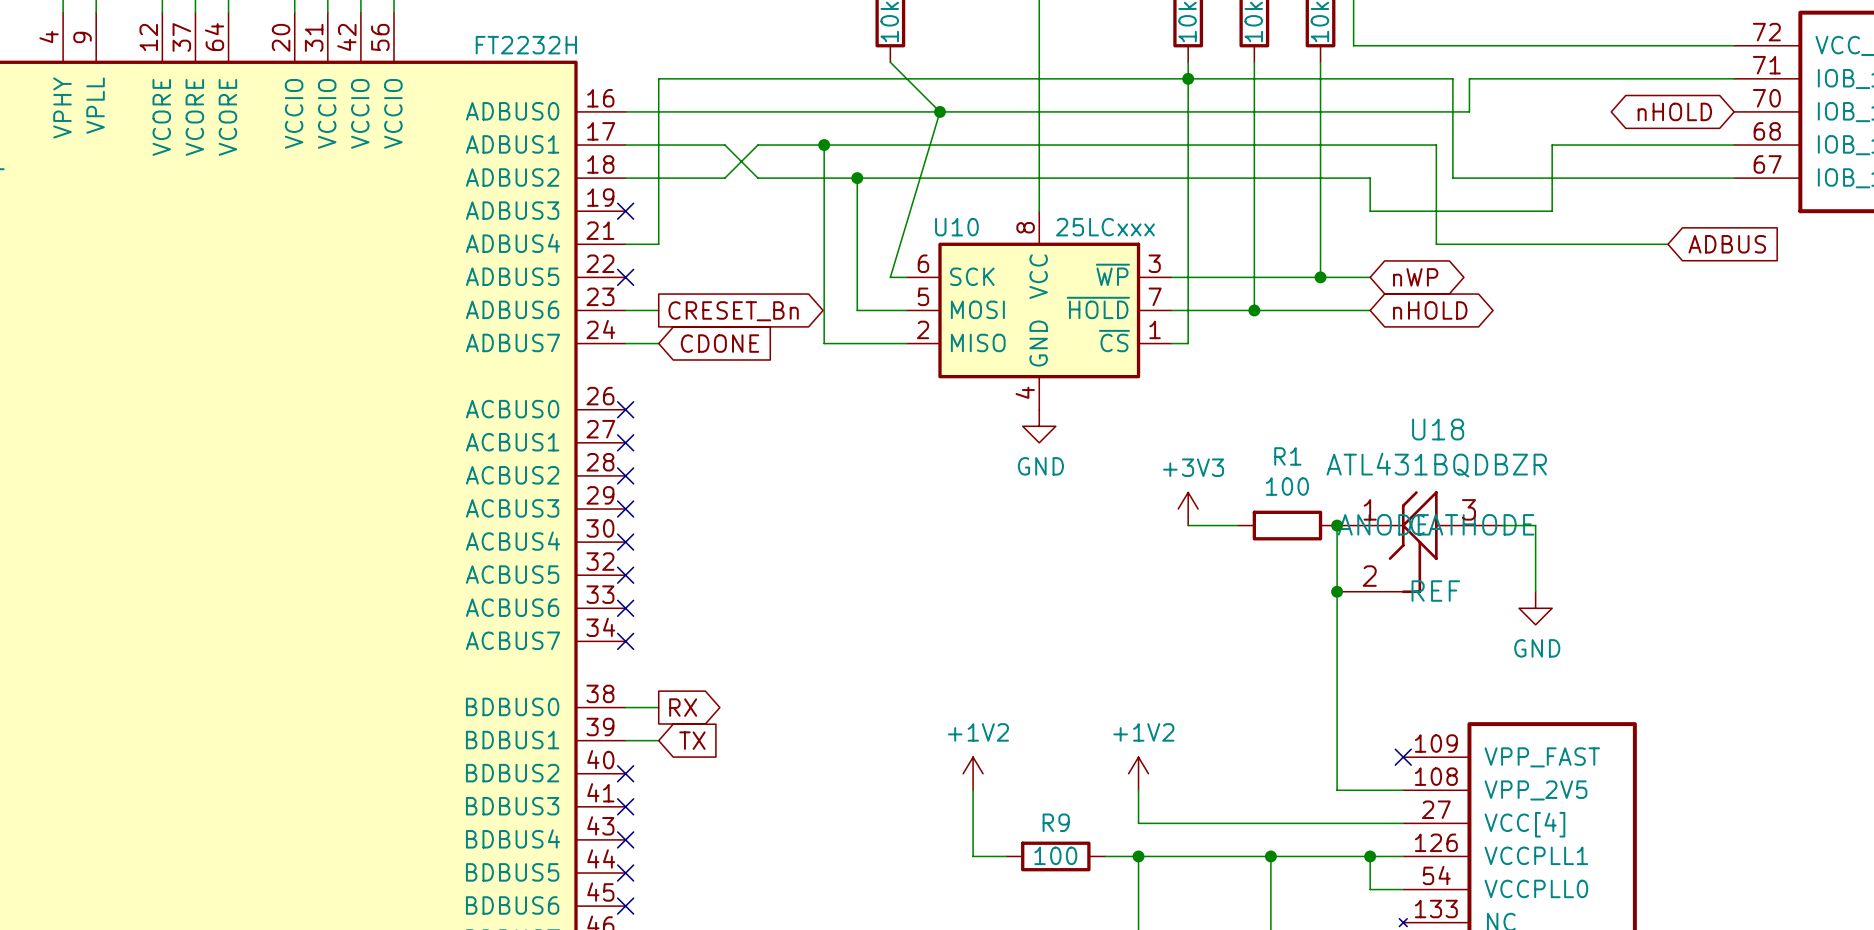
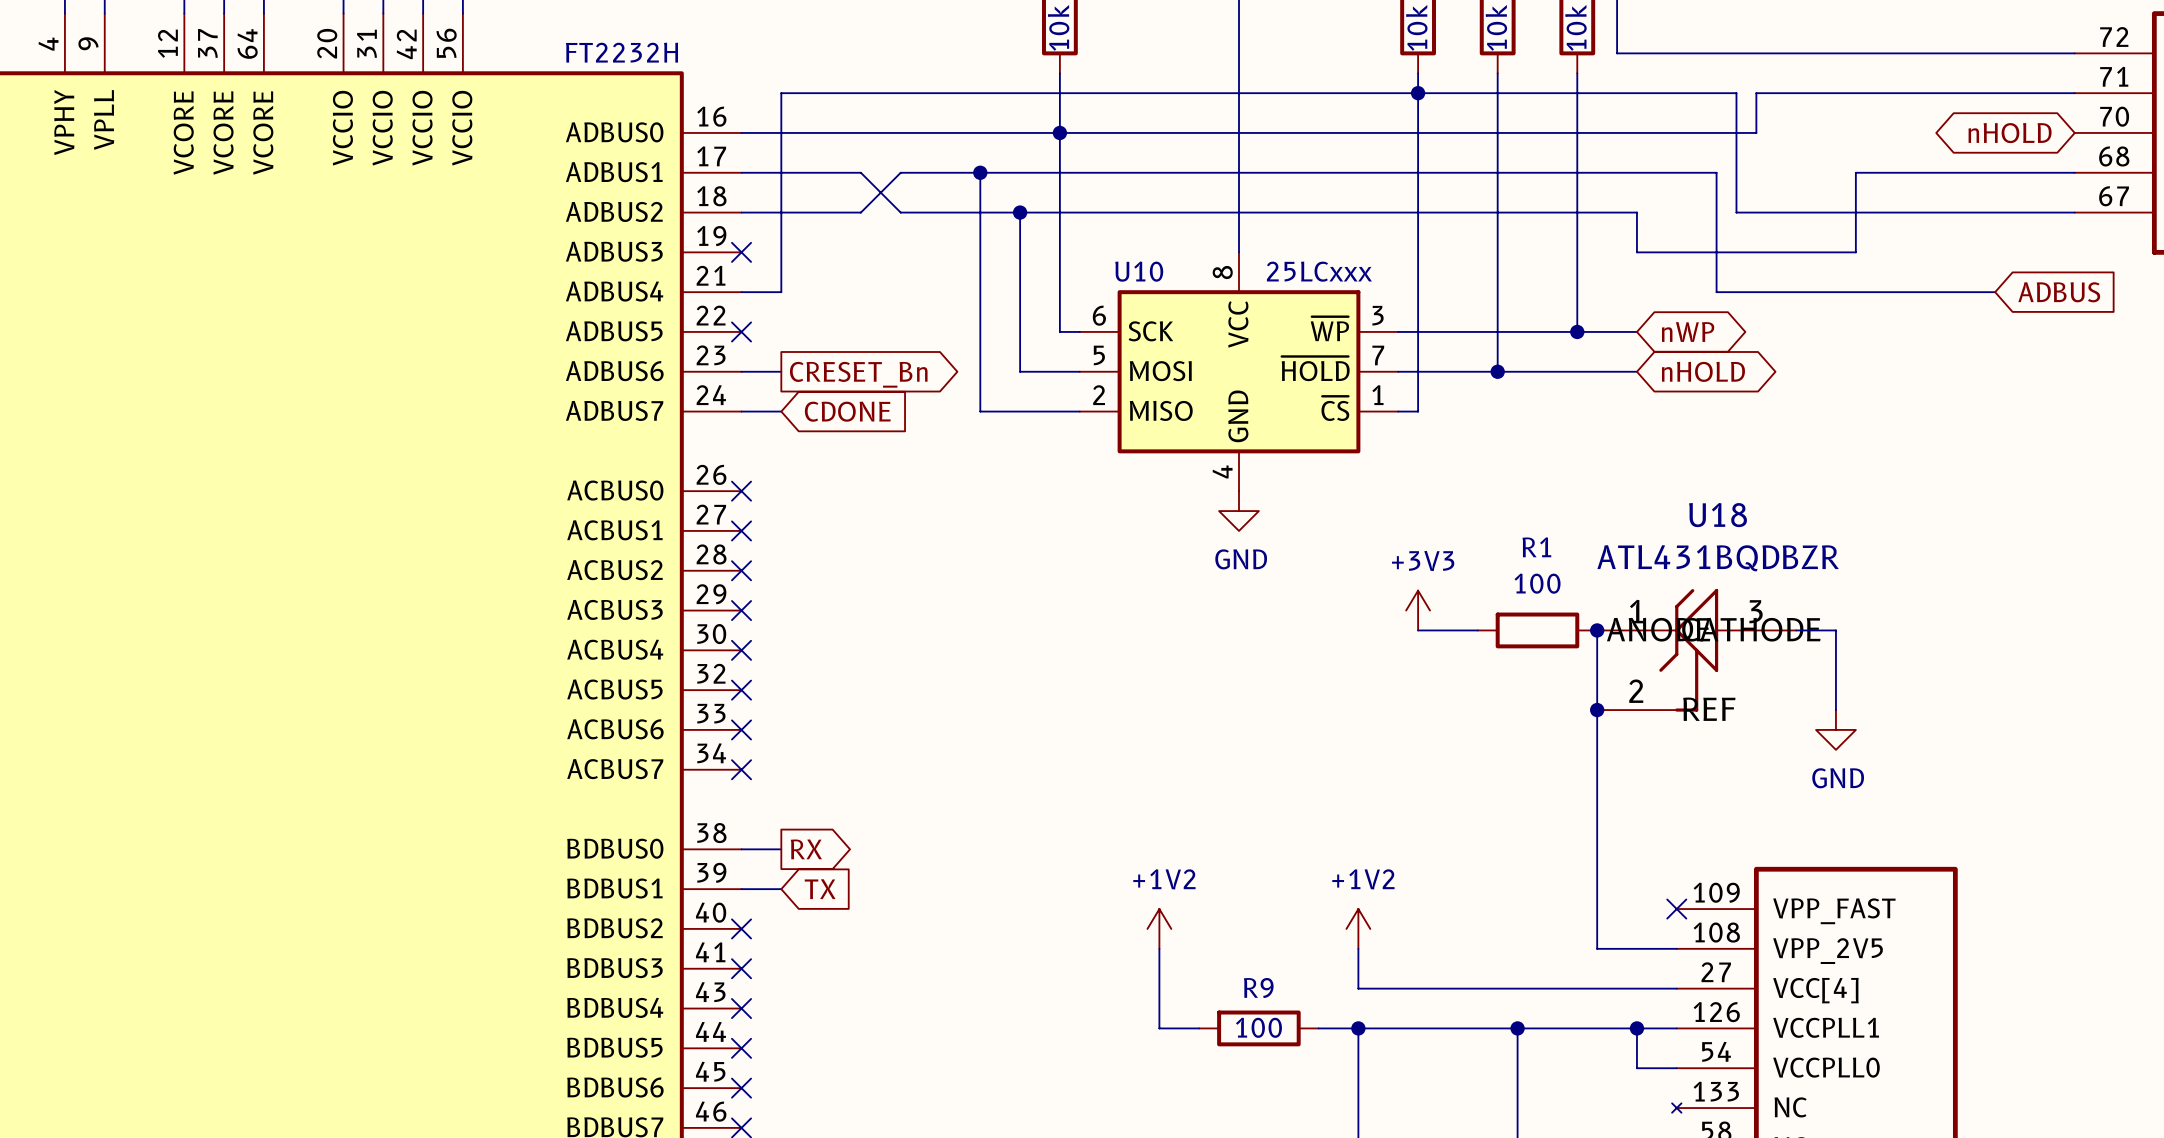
wire: (890, 62) (939, 111) (890, 277) -> (1059, 73) (1059, 331)
junction position: (939, 111) -> (1059, 132)

